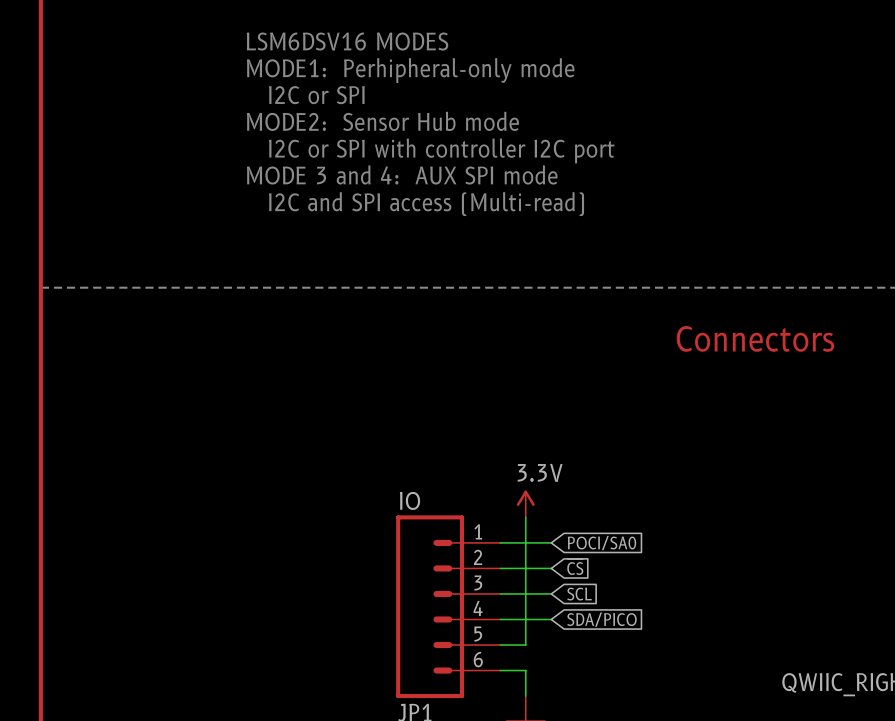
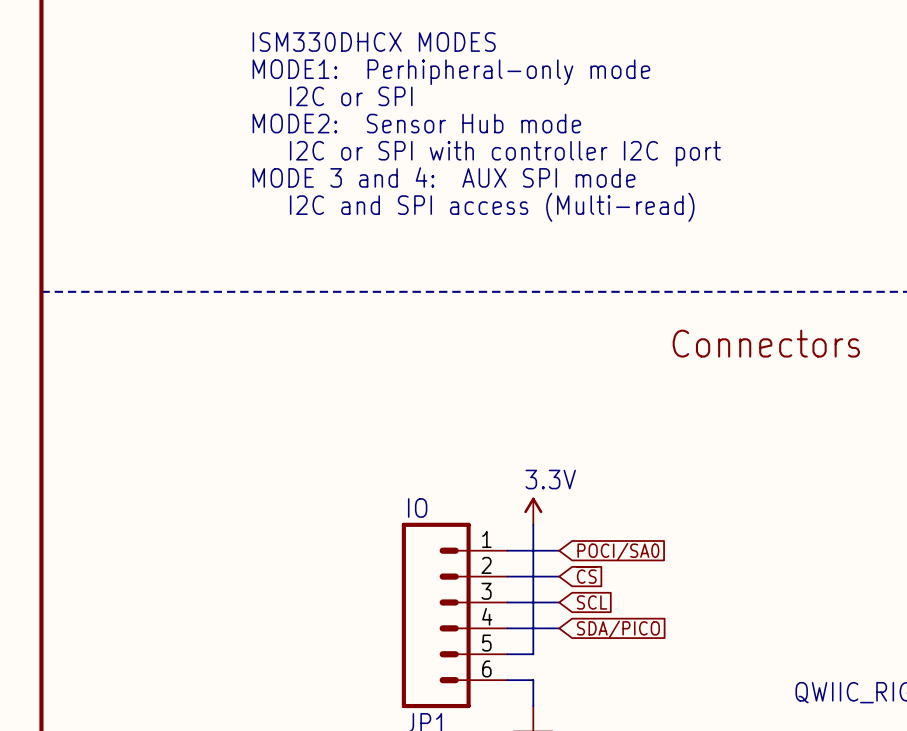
text: LSM6DSV16 MODES (347, 41) -> ISM330DHCX MODES (374, 42)

